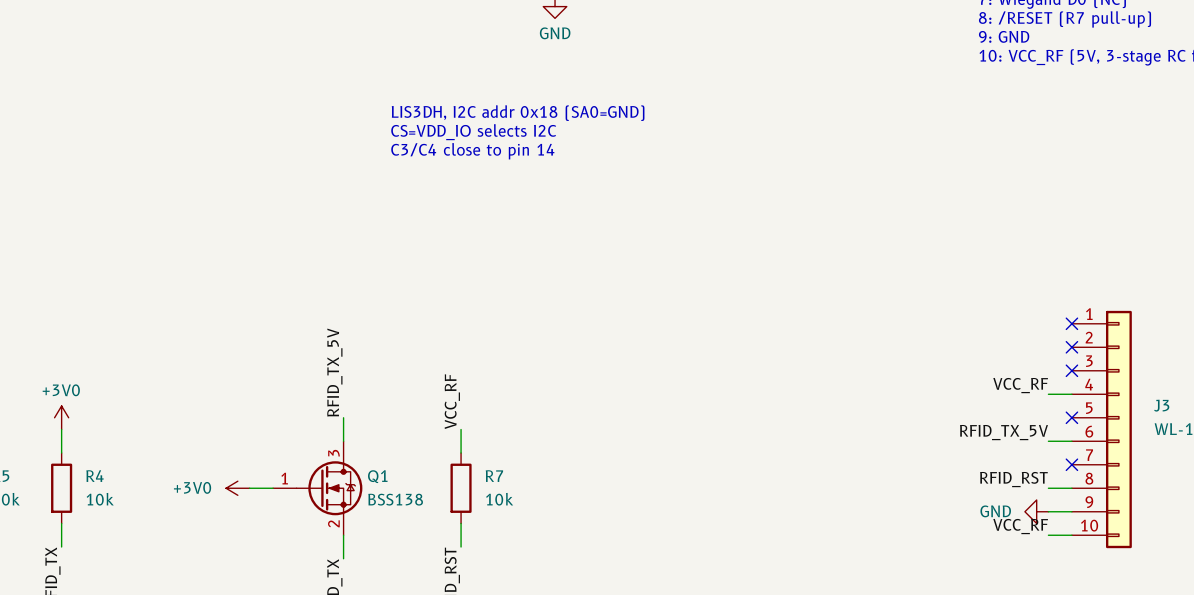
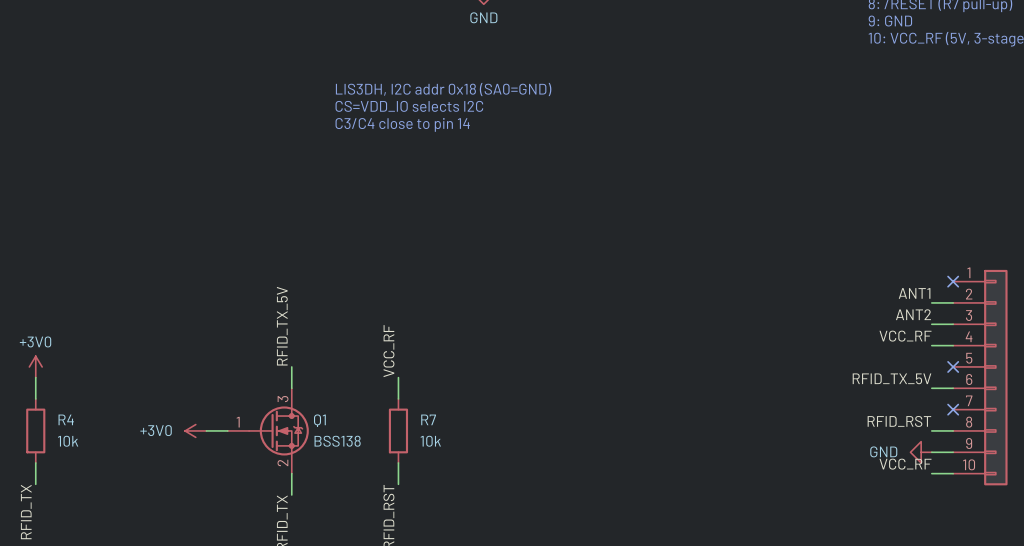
label: none -> ANT1 (914, 293)
wire: none -> (931, 302) (953, 302)
no-connect mark: (1071, 347) -> none
label: none -> ANT2 (913, 314)
wire: none -> (931, 324) (953, 324)
no-connect mark: (1071, 370) -> none

